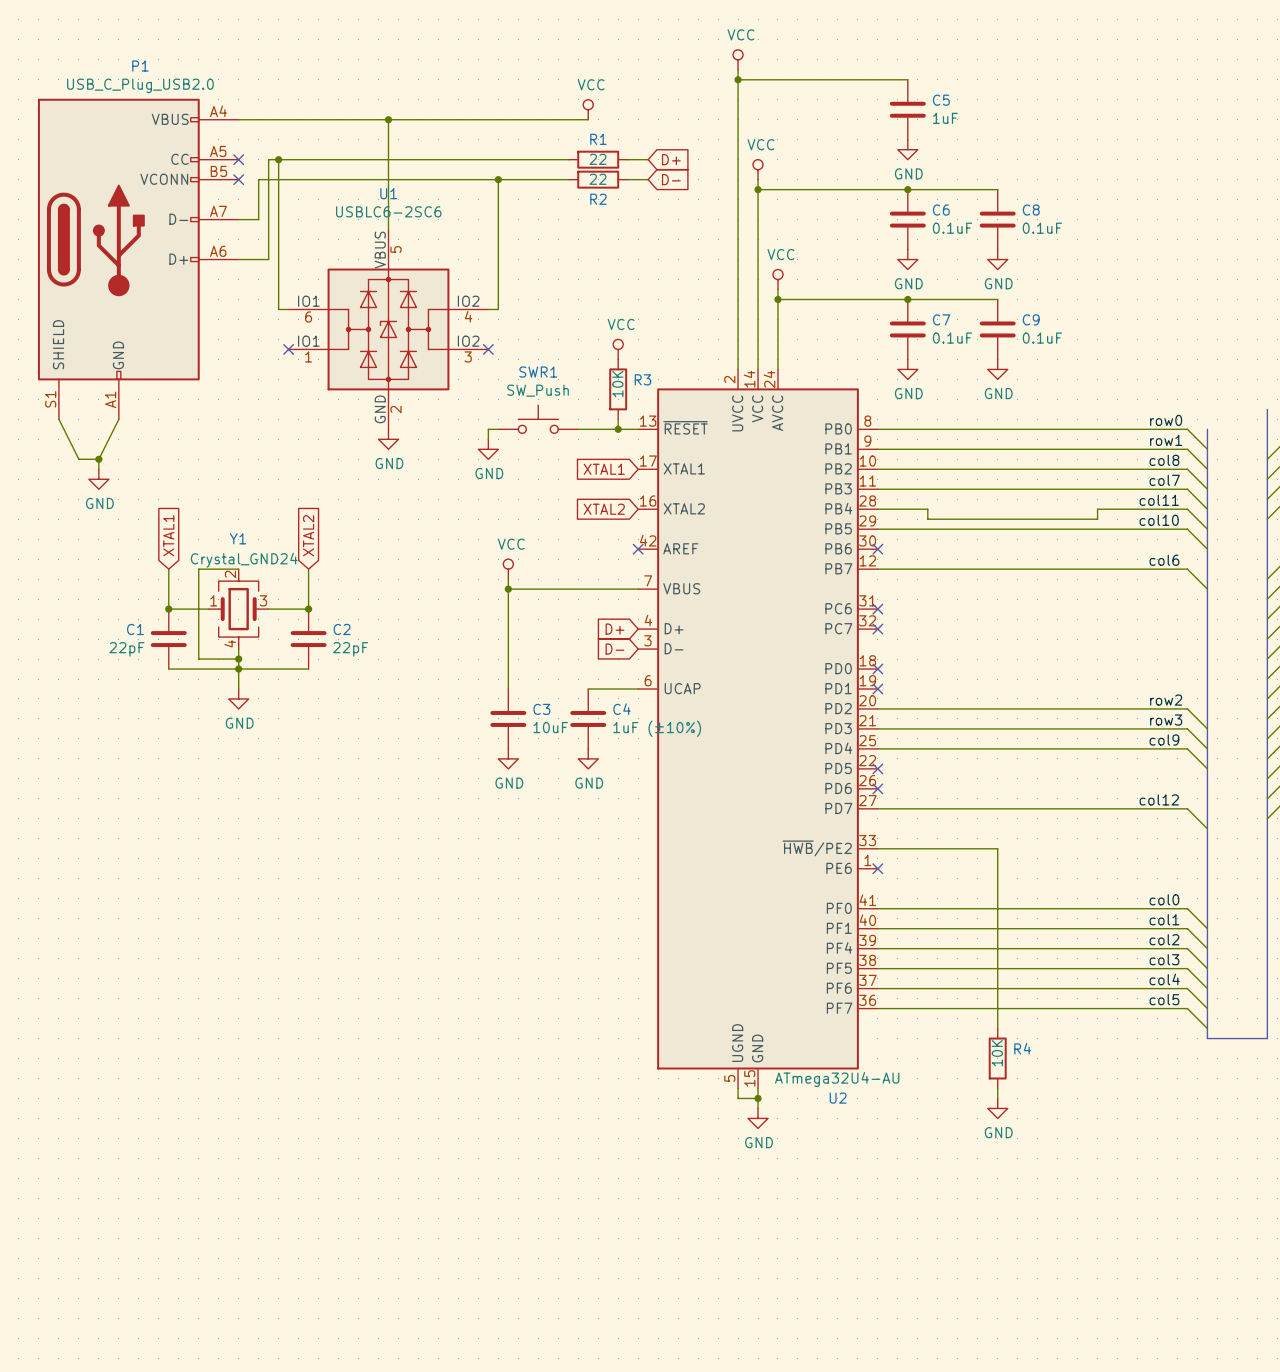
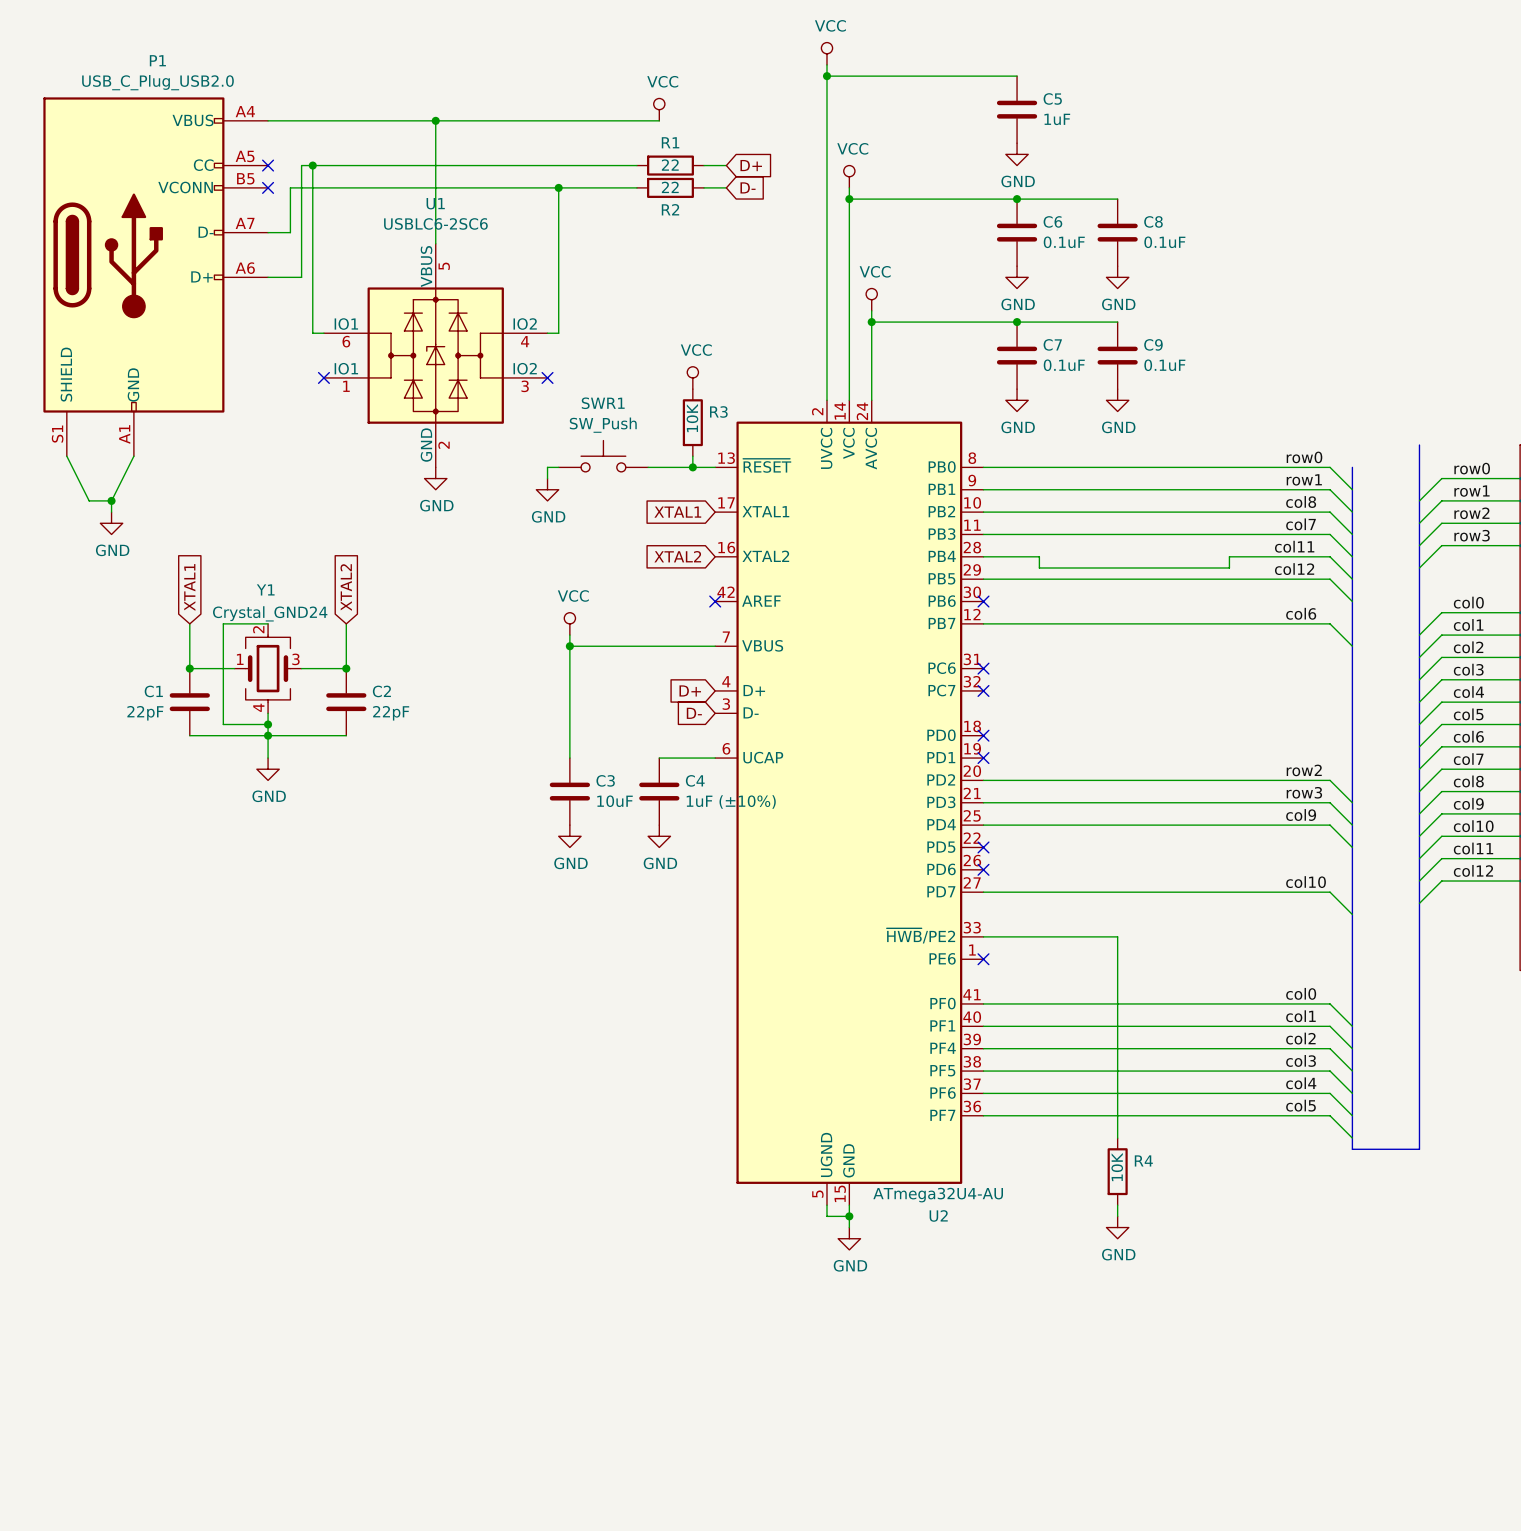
label: col10 (1159, 520) -> col12 (1294, 569)
label: col12 (1159, 799) -> col10 (1306, 882)

